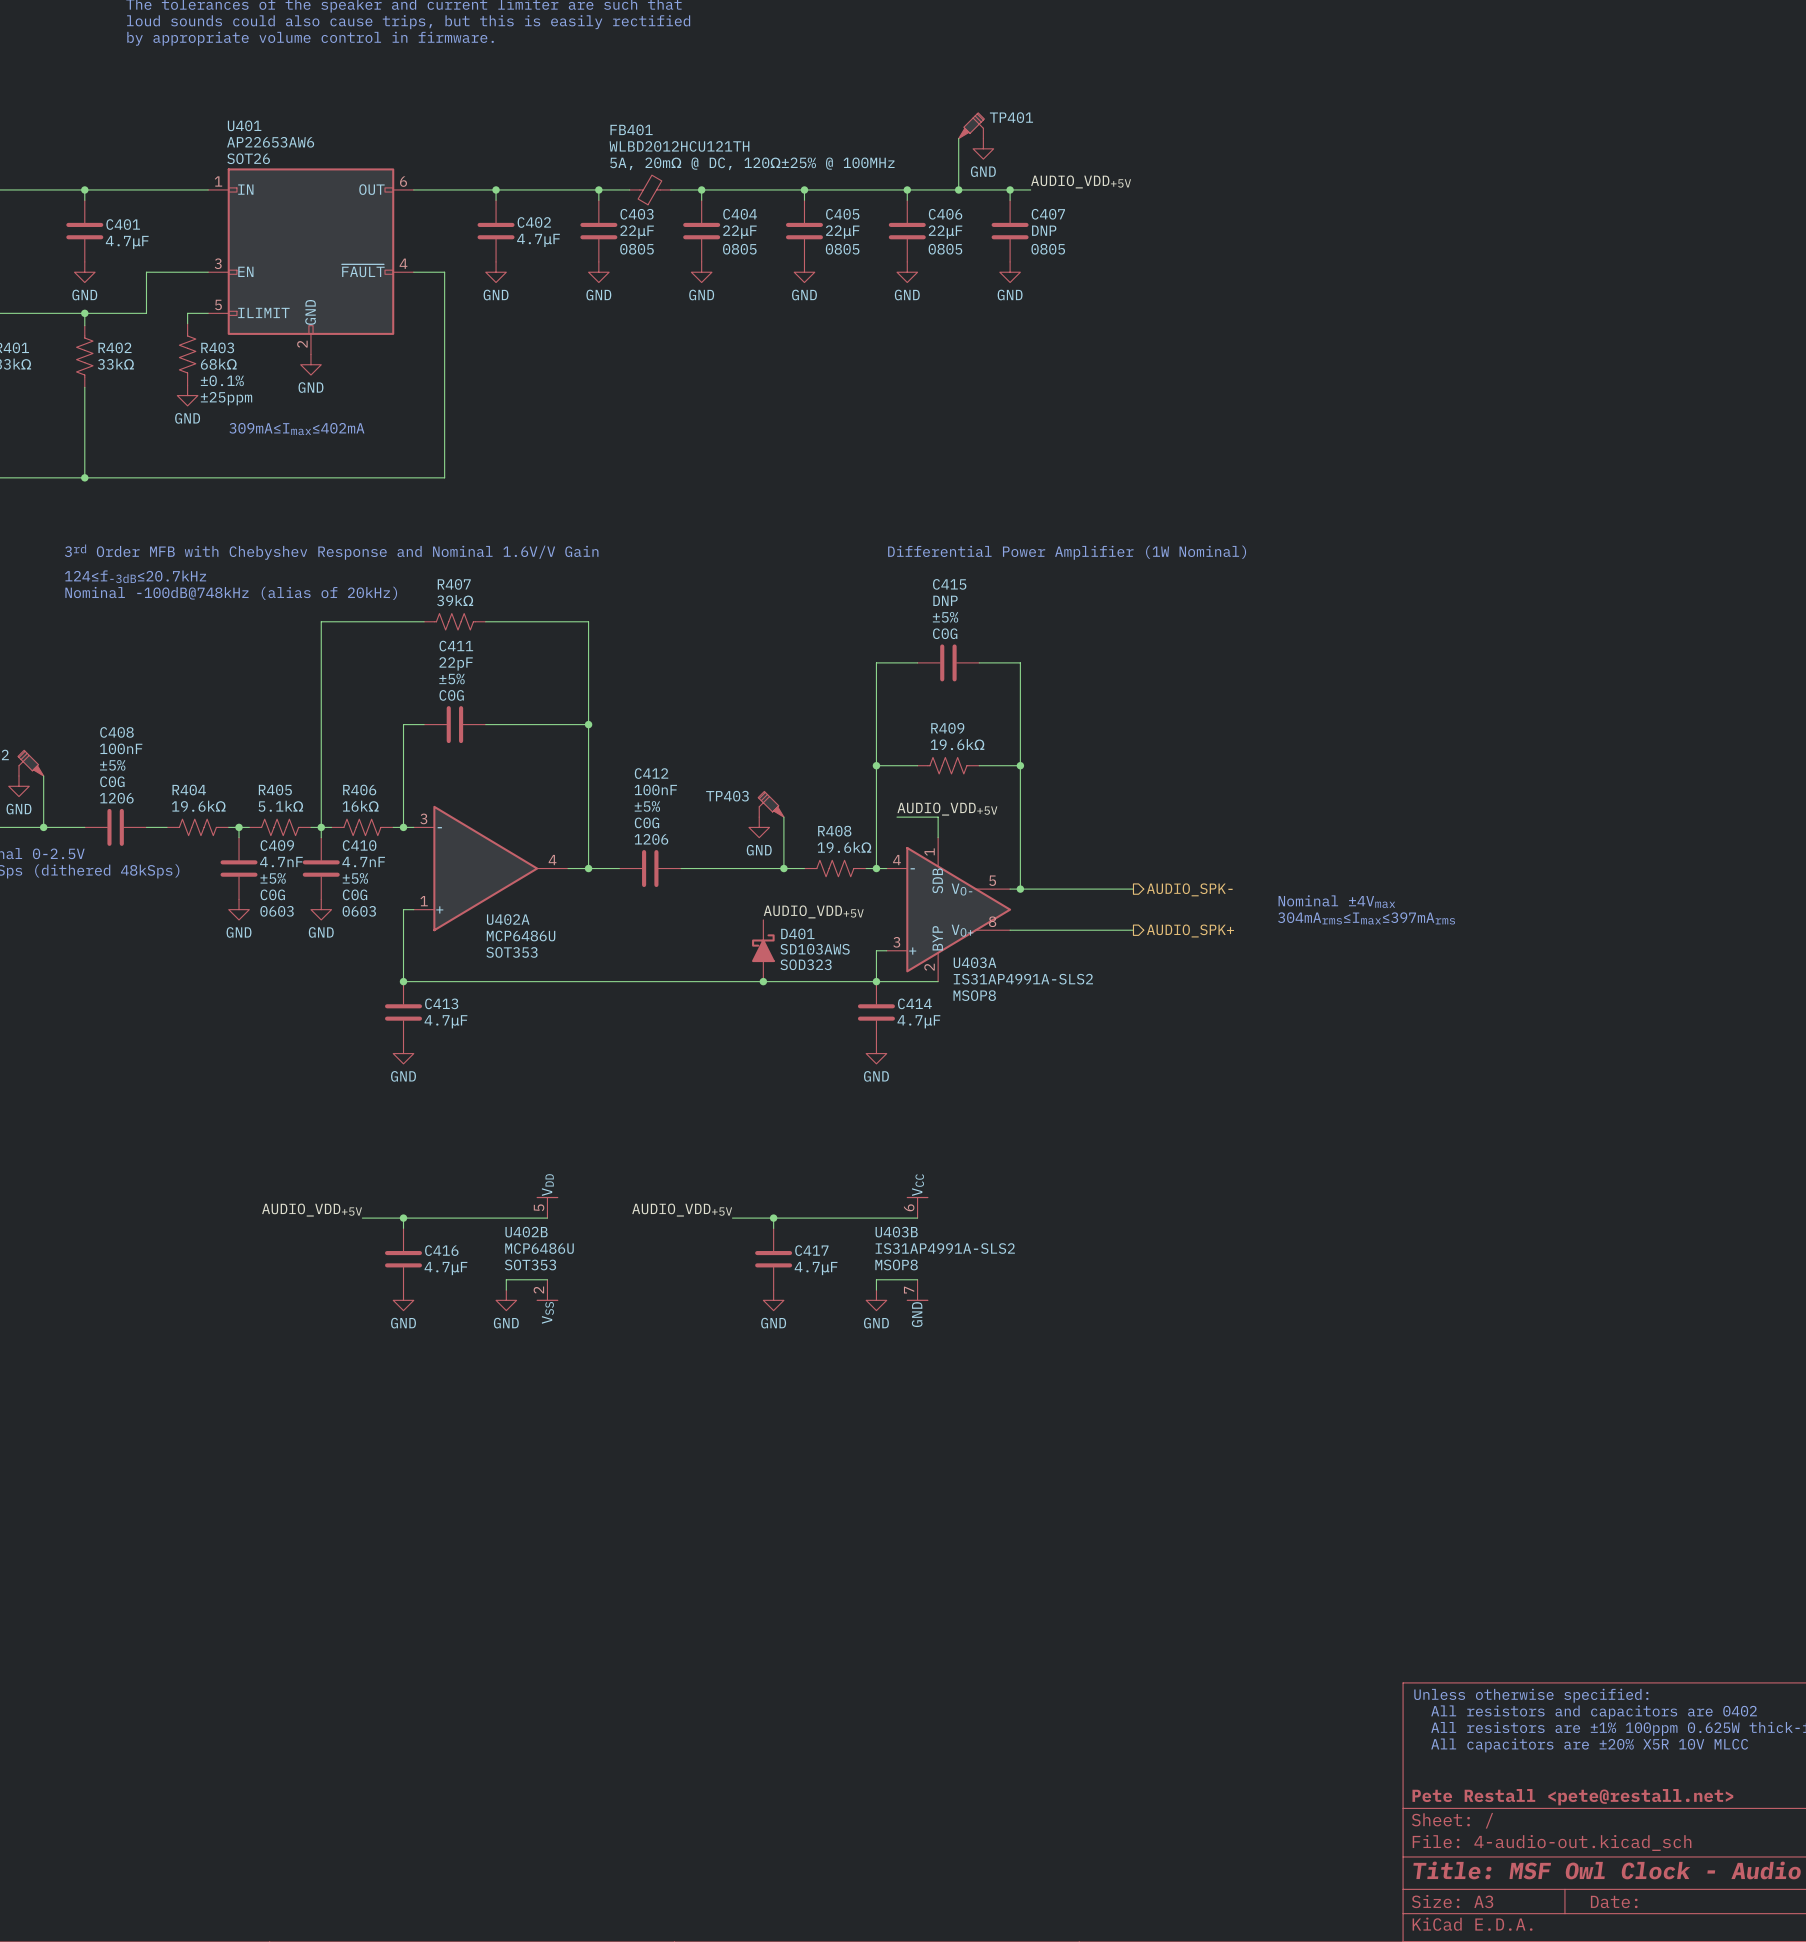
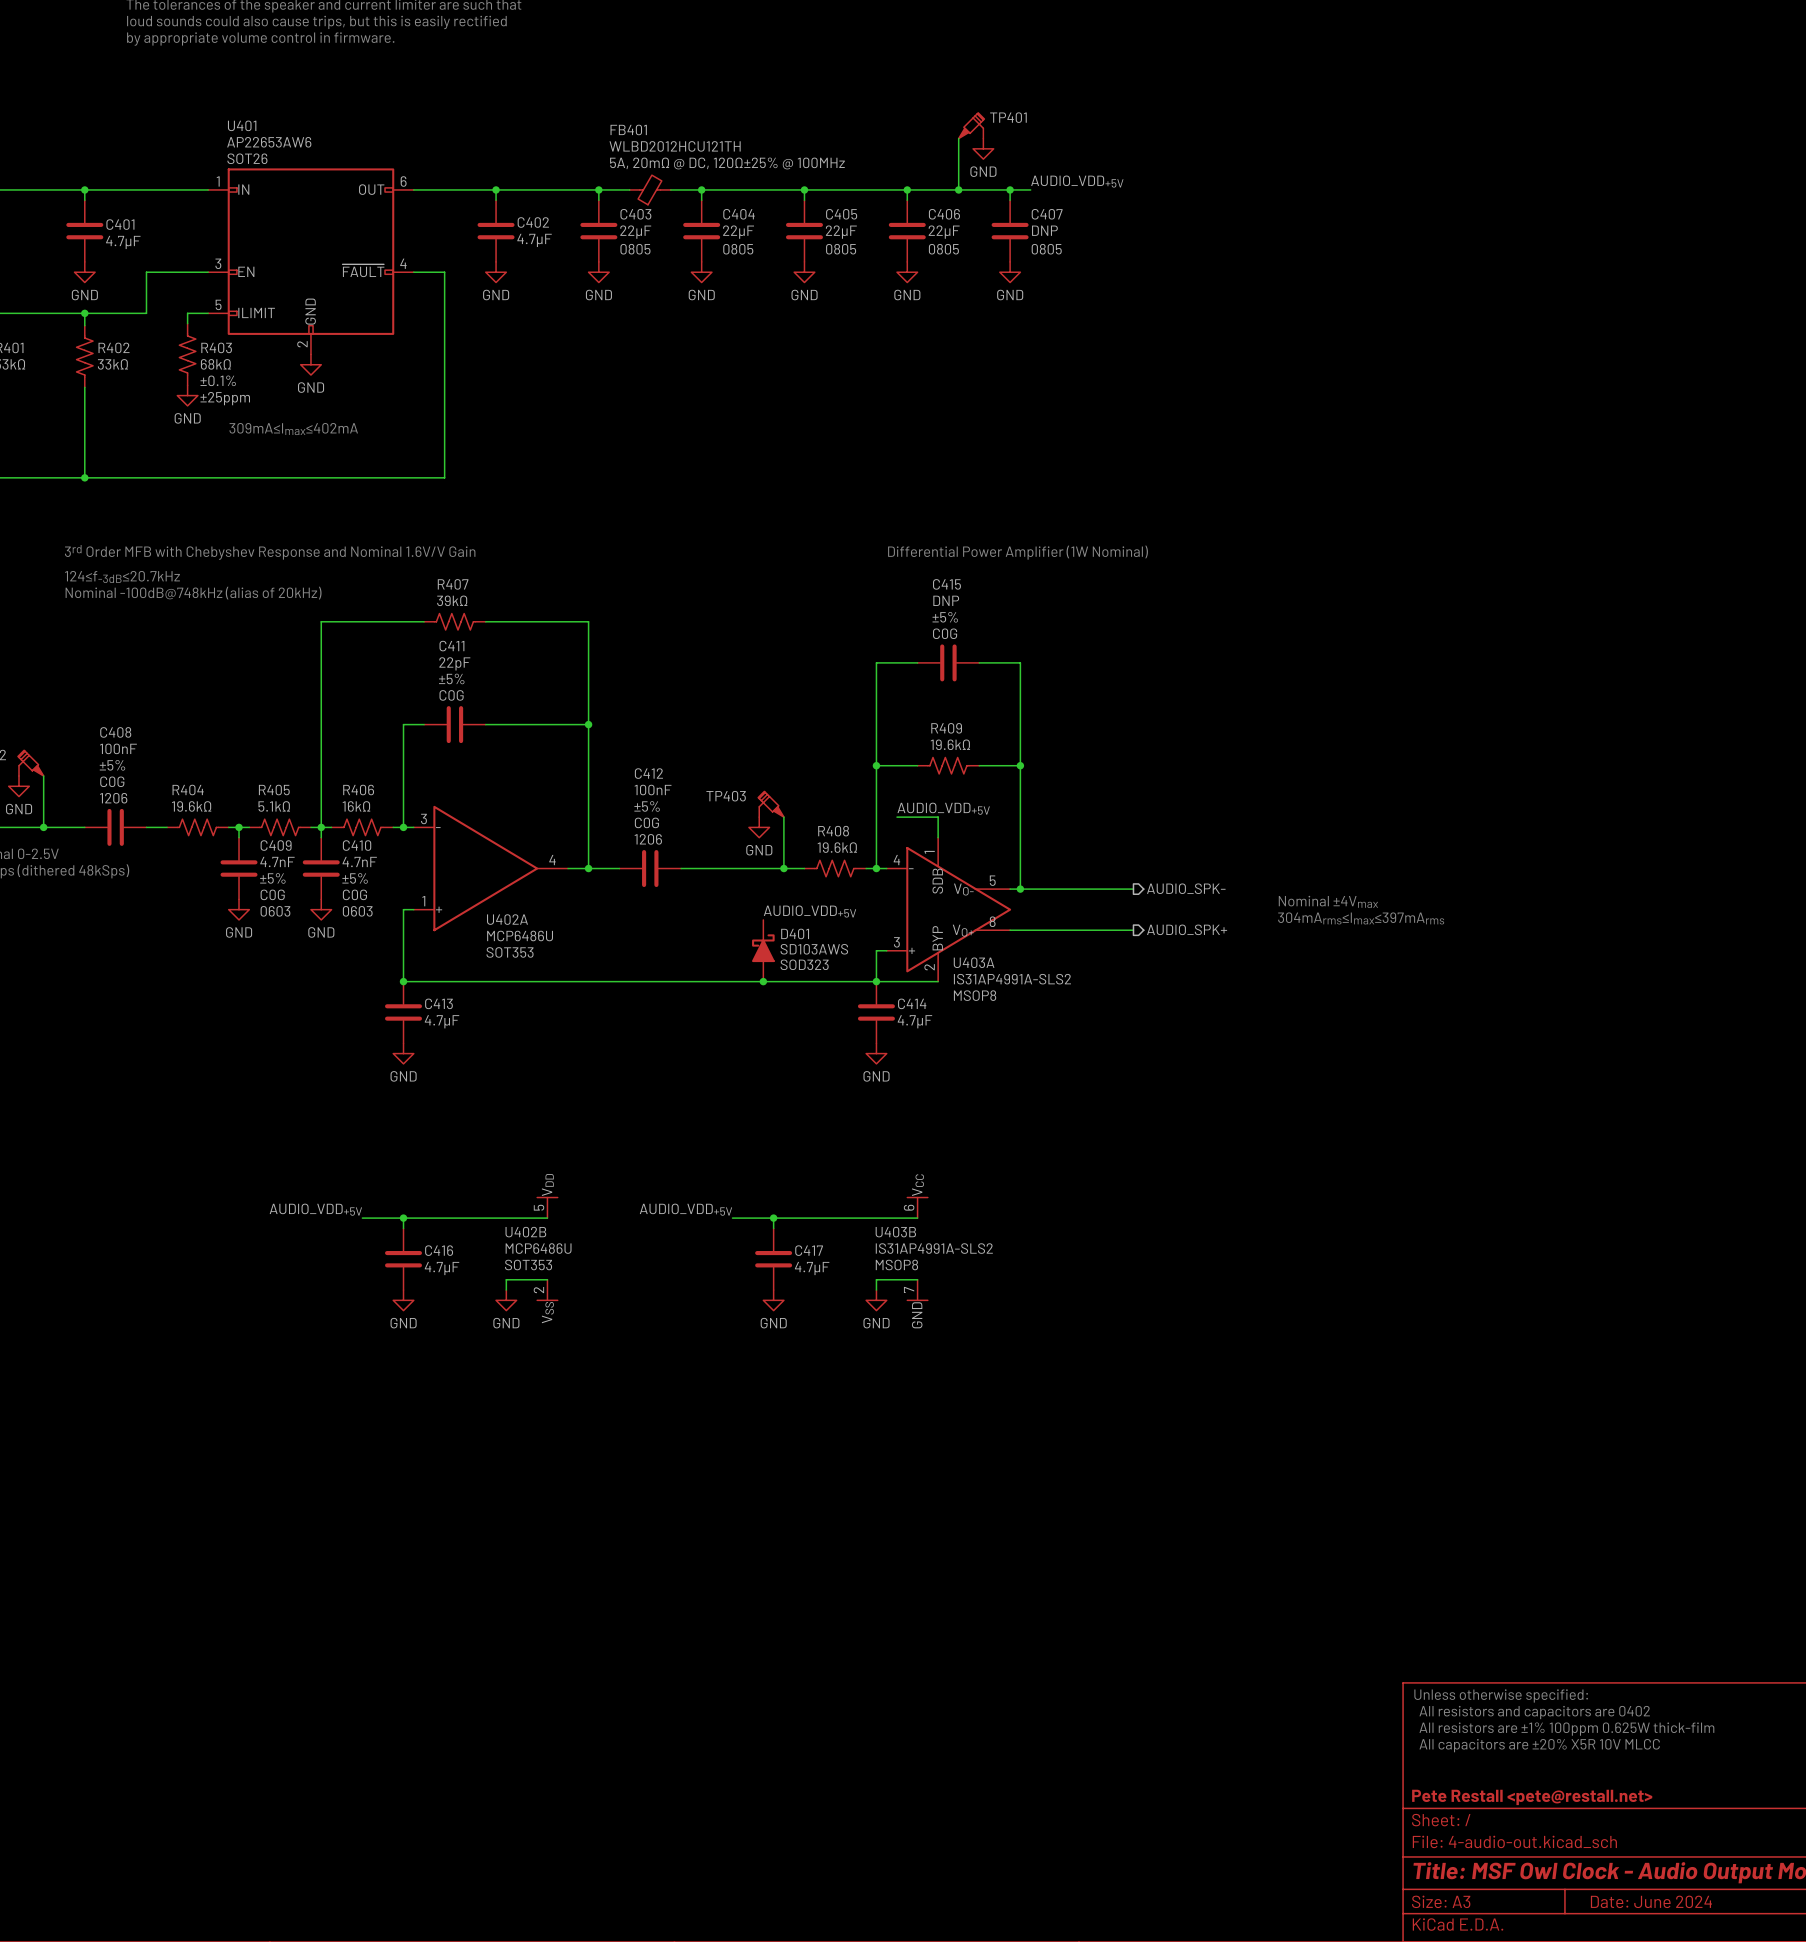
title block: Date: (1614, 1901) -> Date: June 2024 (1651, 1901)

